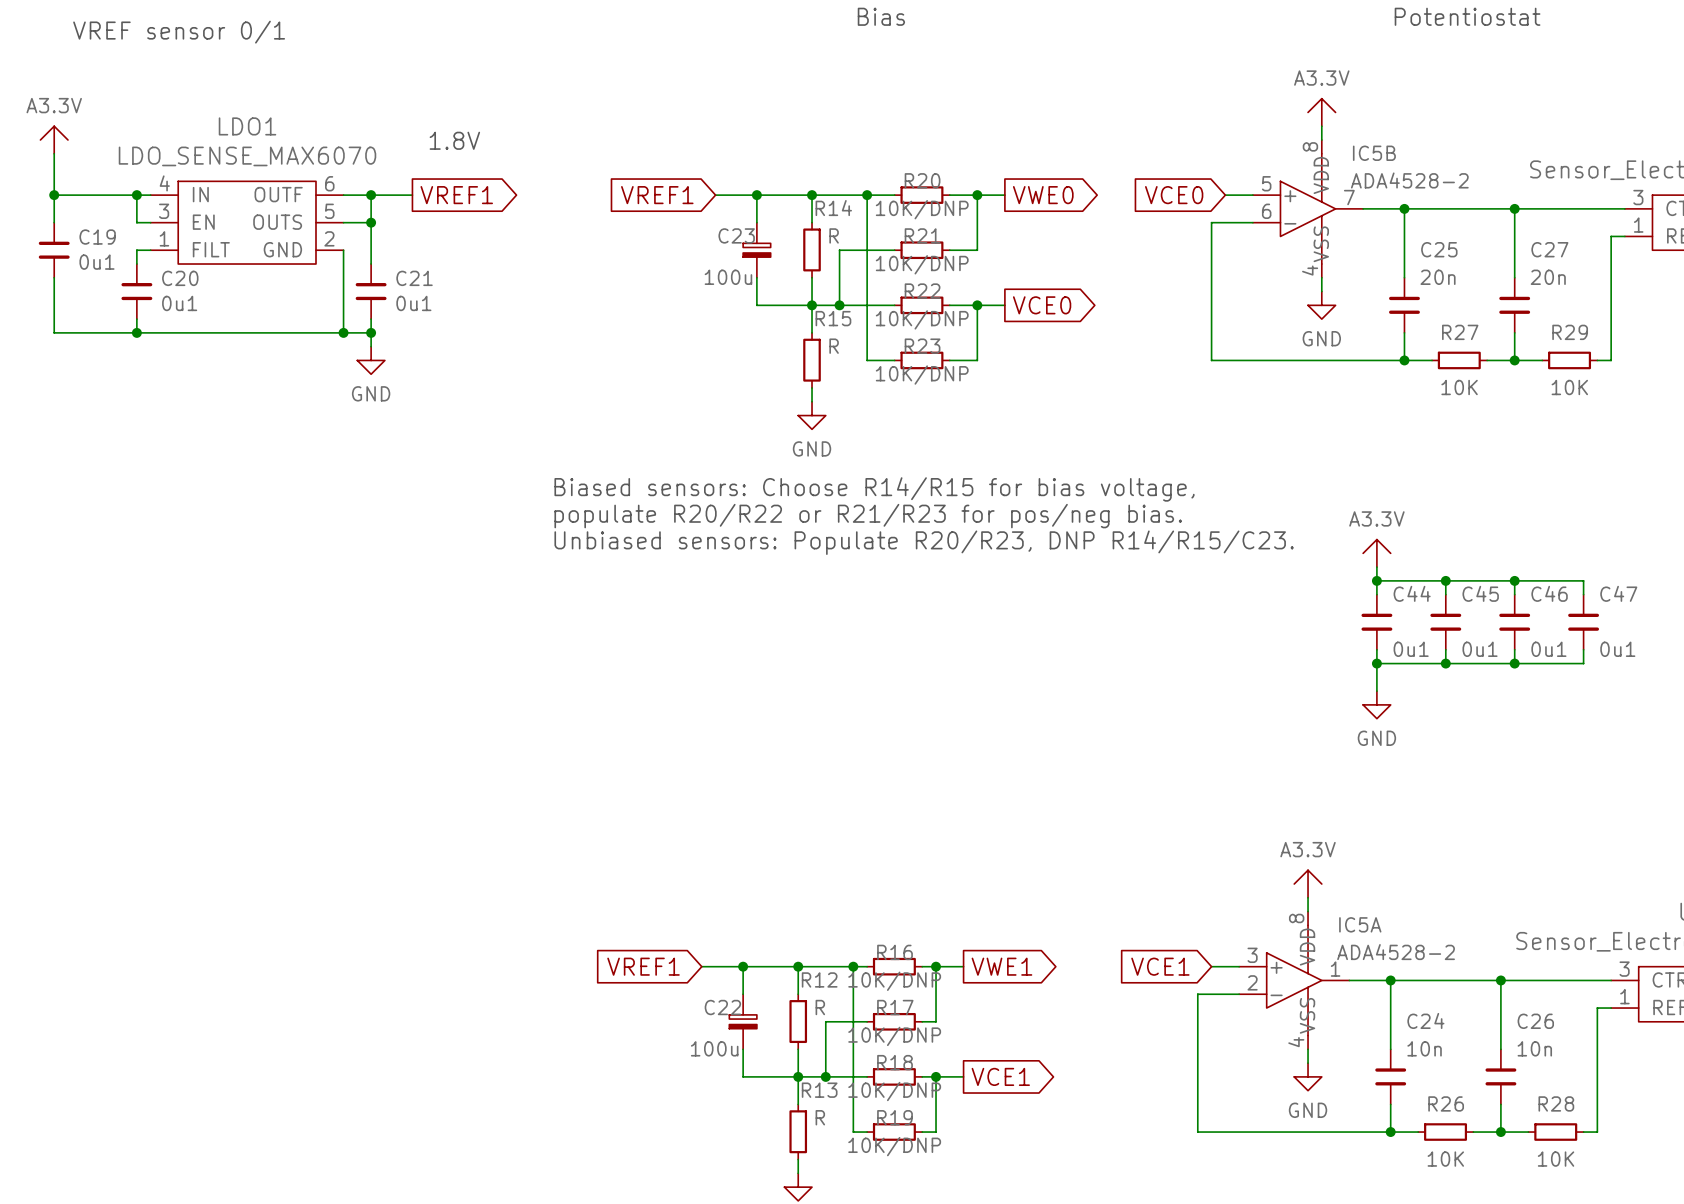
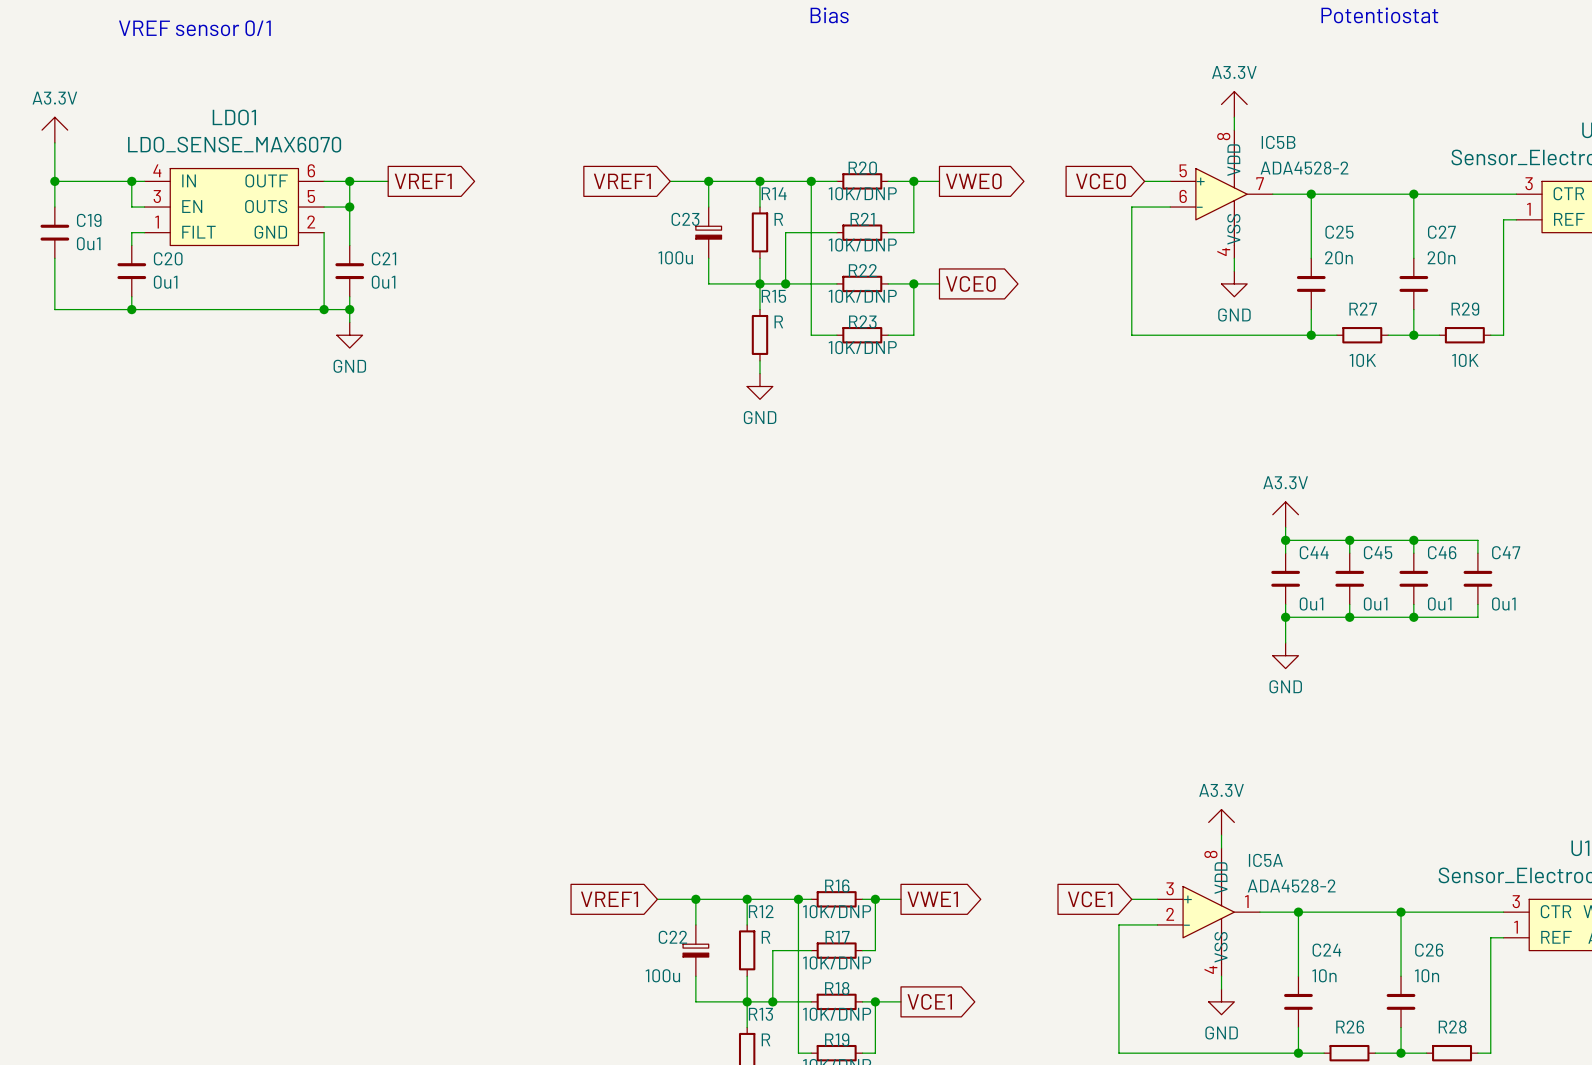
text: 1.8V (454, 140) -> none
text: Biased sensors: Choose R14/R15 for bias voltage, (874, 489) -> none
text: populate R20/R22 or R21/R23 for pos/neg bias. (868, 516) -> none
text: Unbiased sensors: Populate R20/R23, DNP R14/R15/C23. (924, 542) -> none

